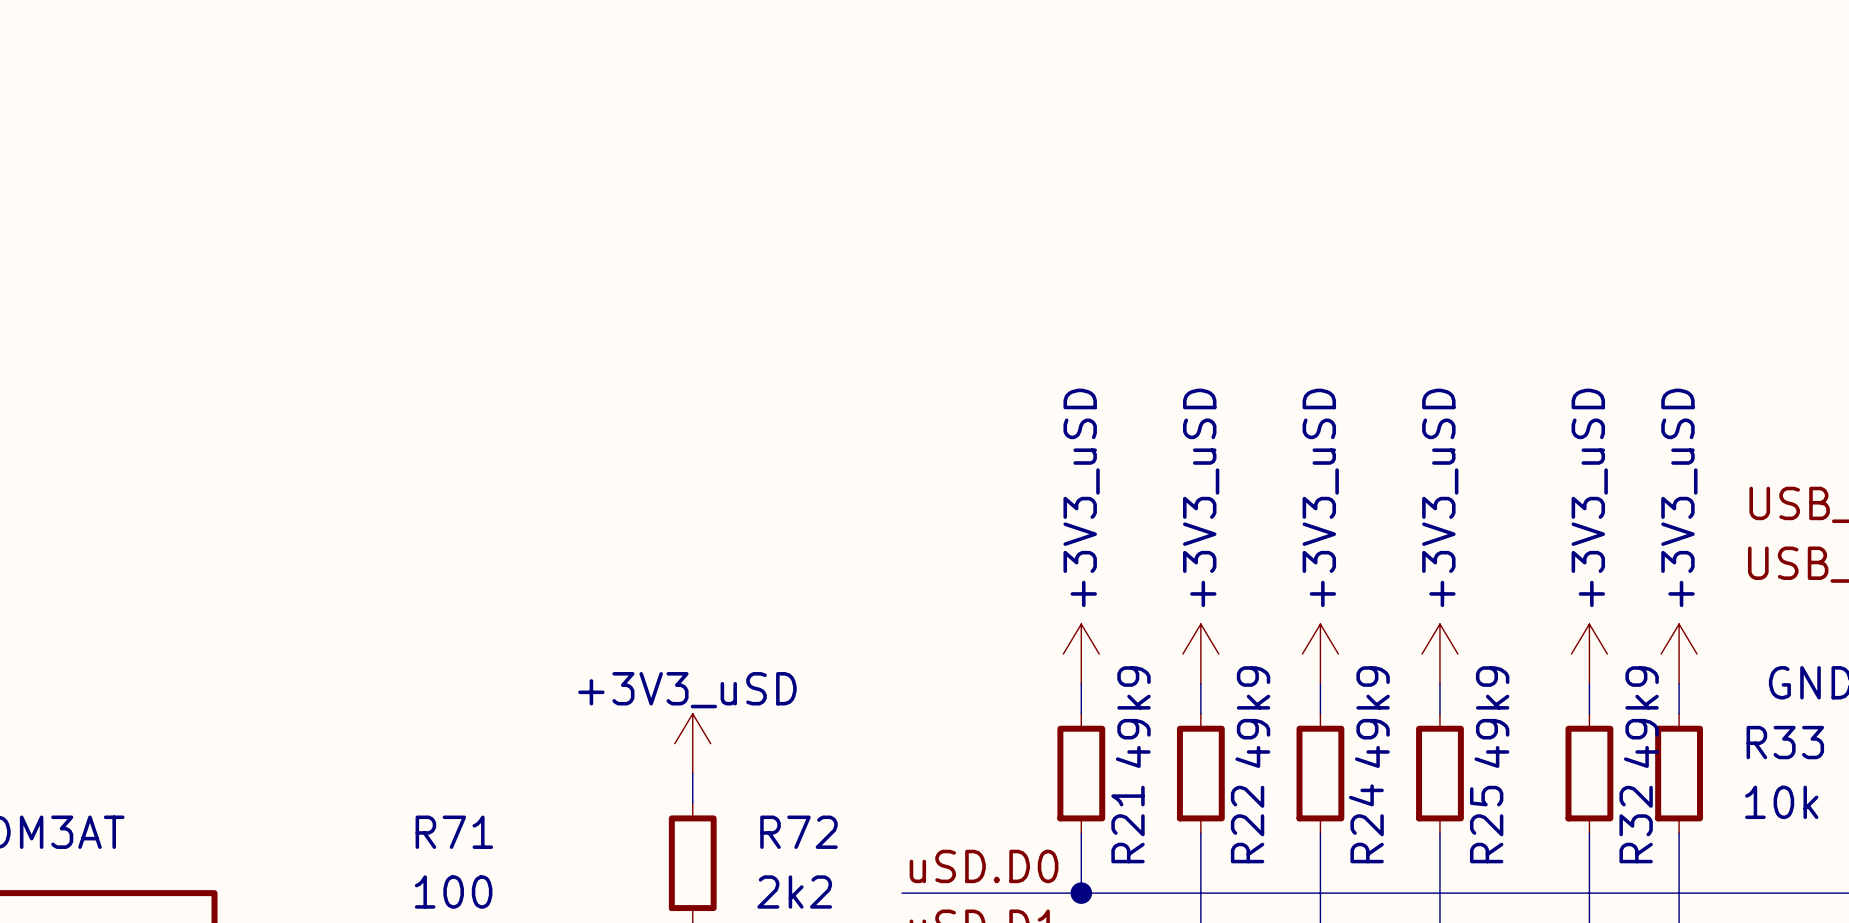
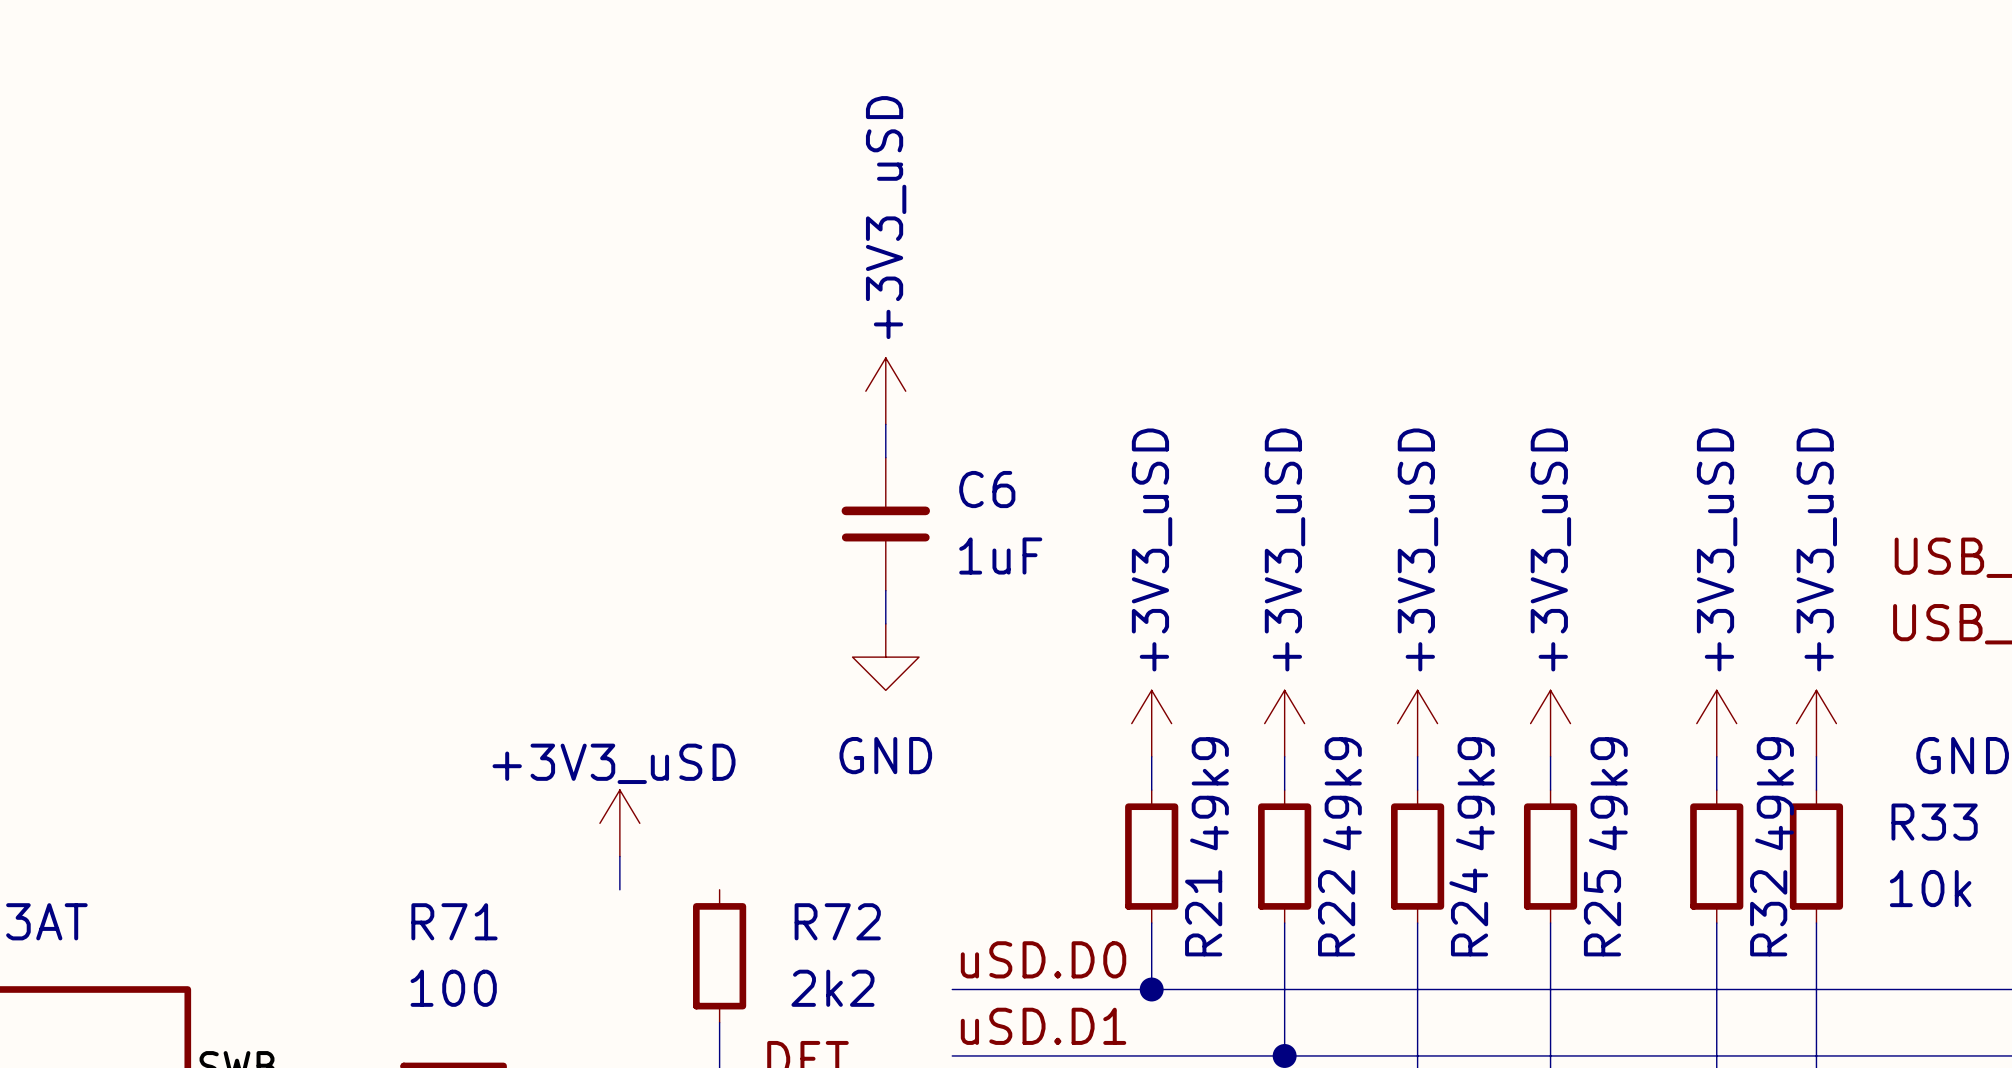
power symbol: none -> +3V3_uSD (885, 391)
wire: none -> (885, 424) (885, 457)
C6: none -> (885, 524)
wire: none -> (885, 590) (885, 623)
power symbol: none -> GND (885, 657)
power symbol position: +3V3_uSD (692, 743) -> +3V3_uSD (619, 823)
wire: (692, 773) (692, 803) -> (619, 856) (619, 889)

